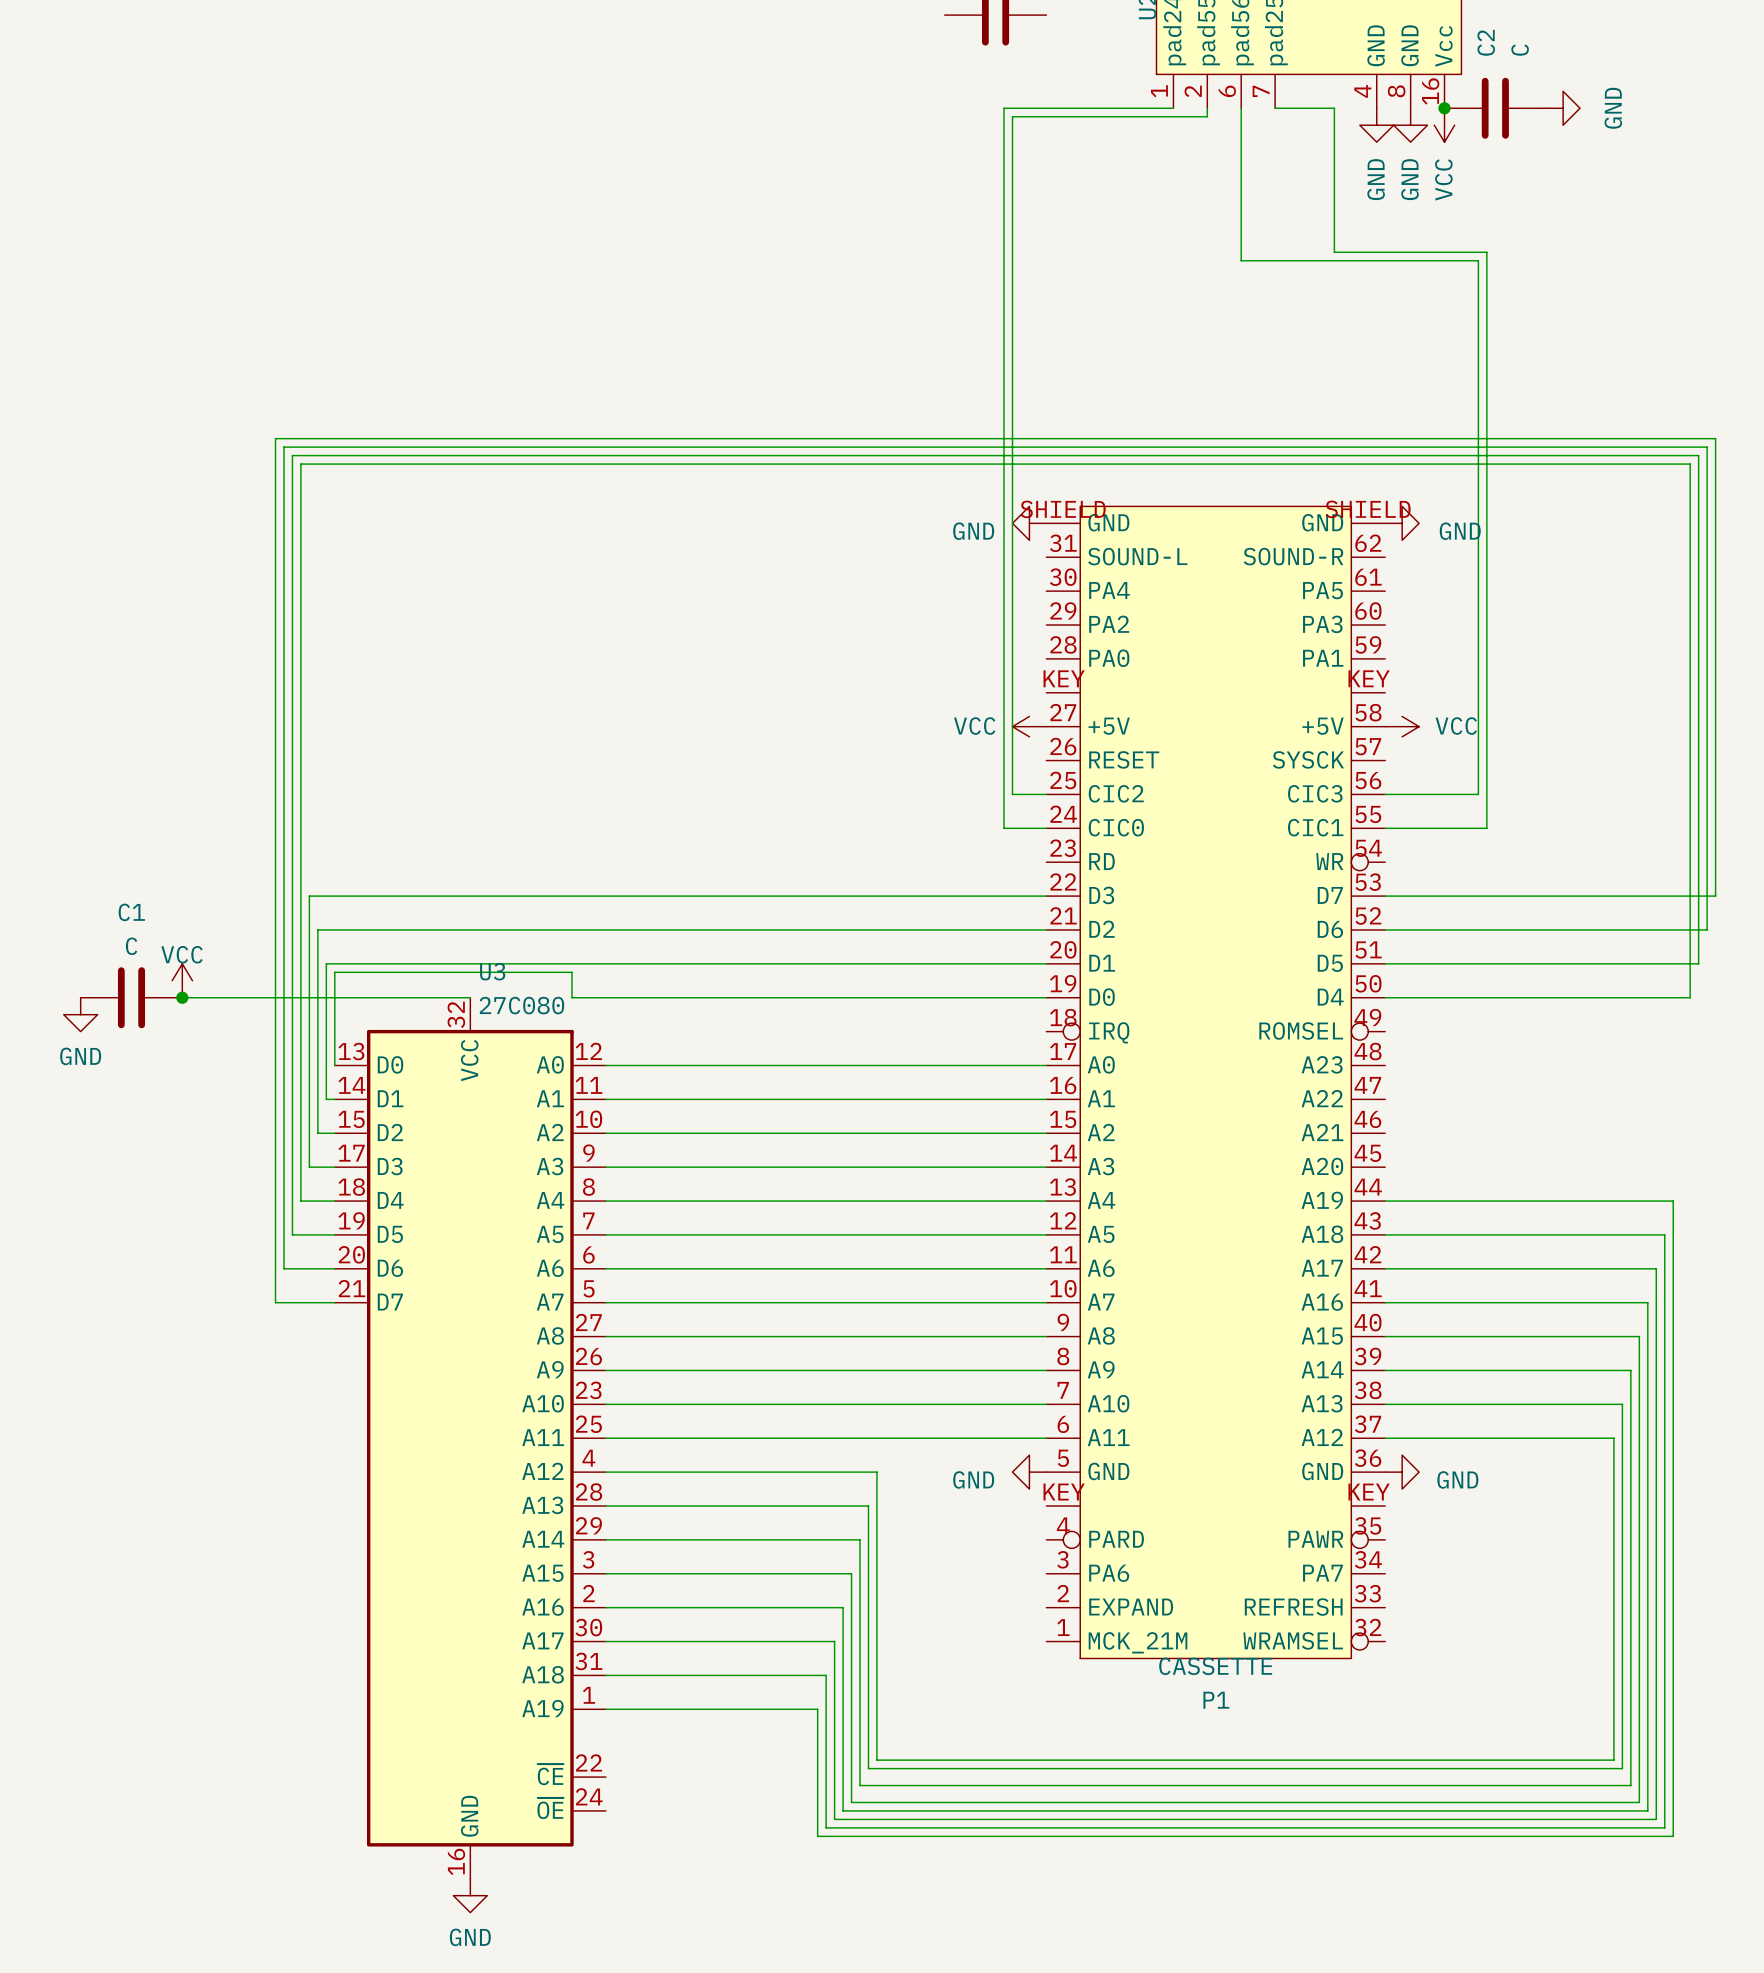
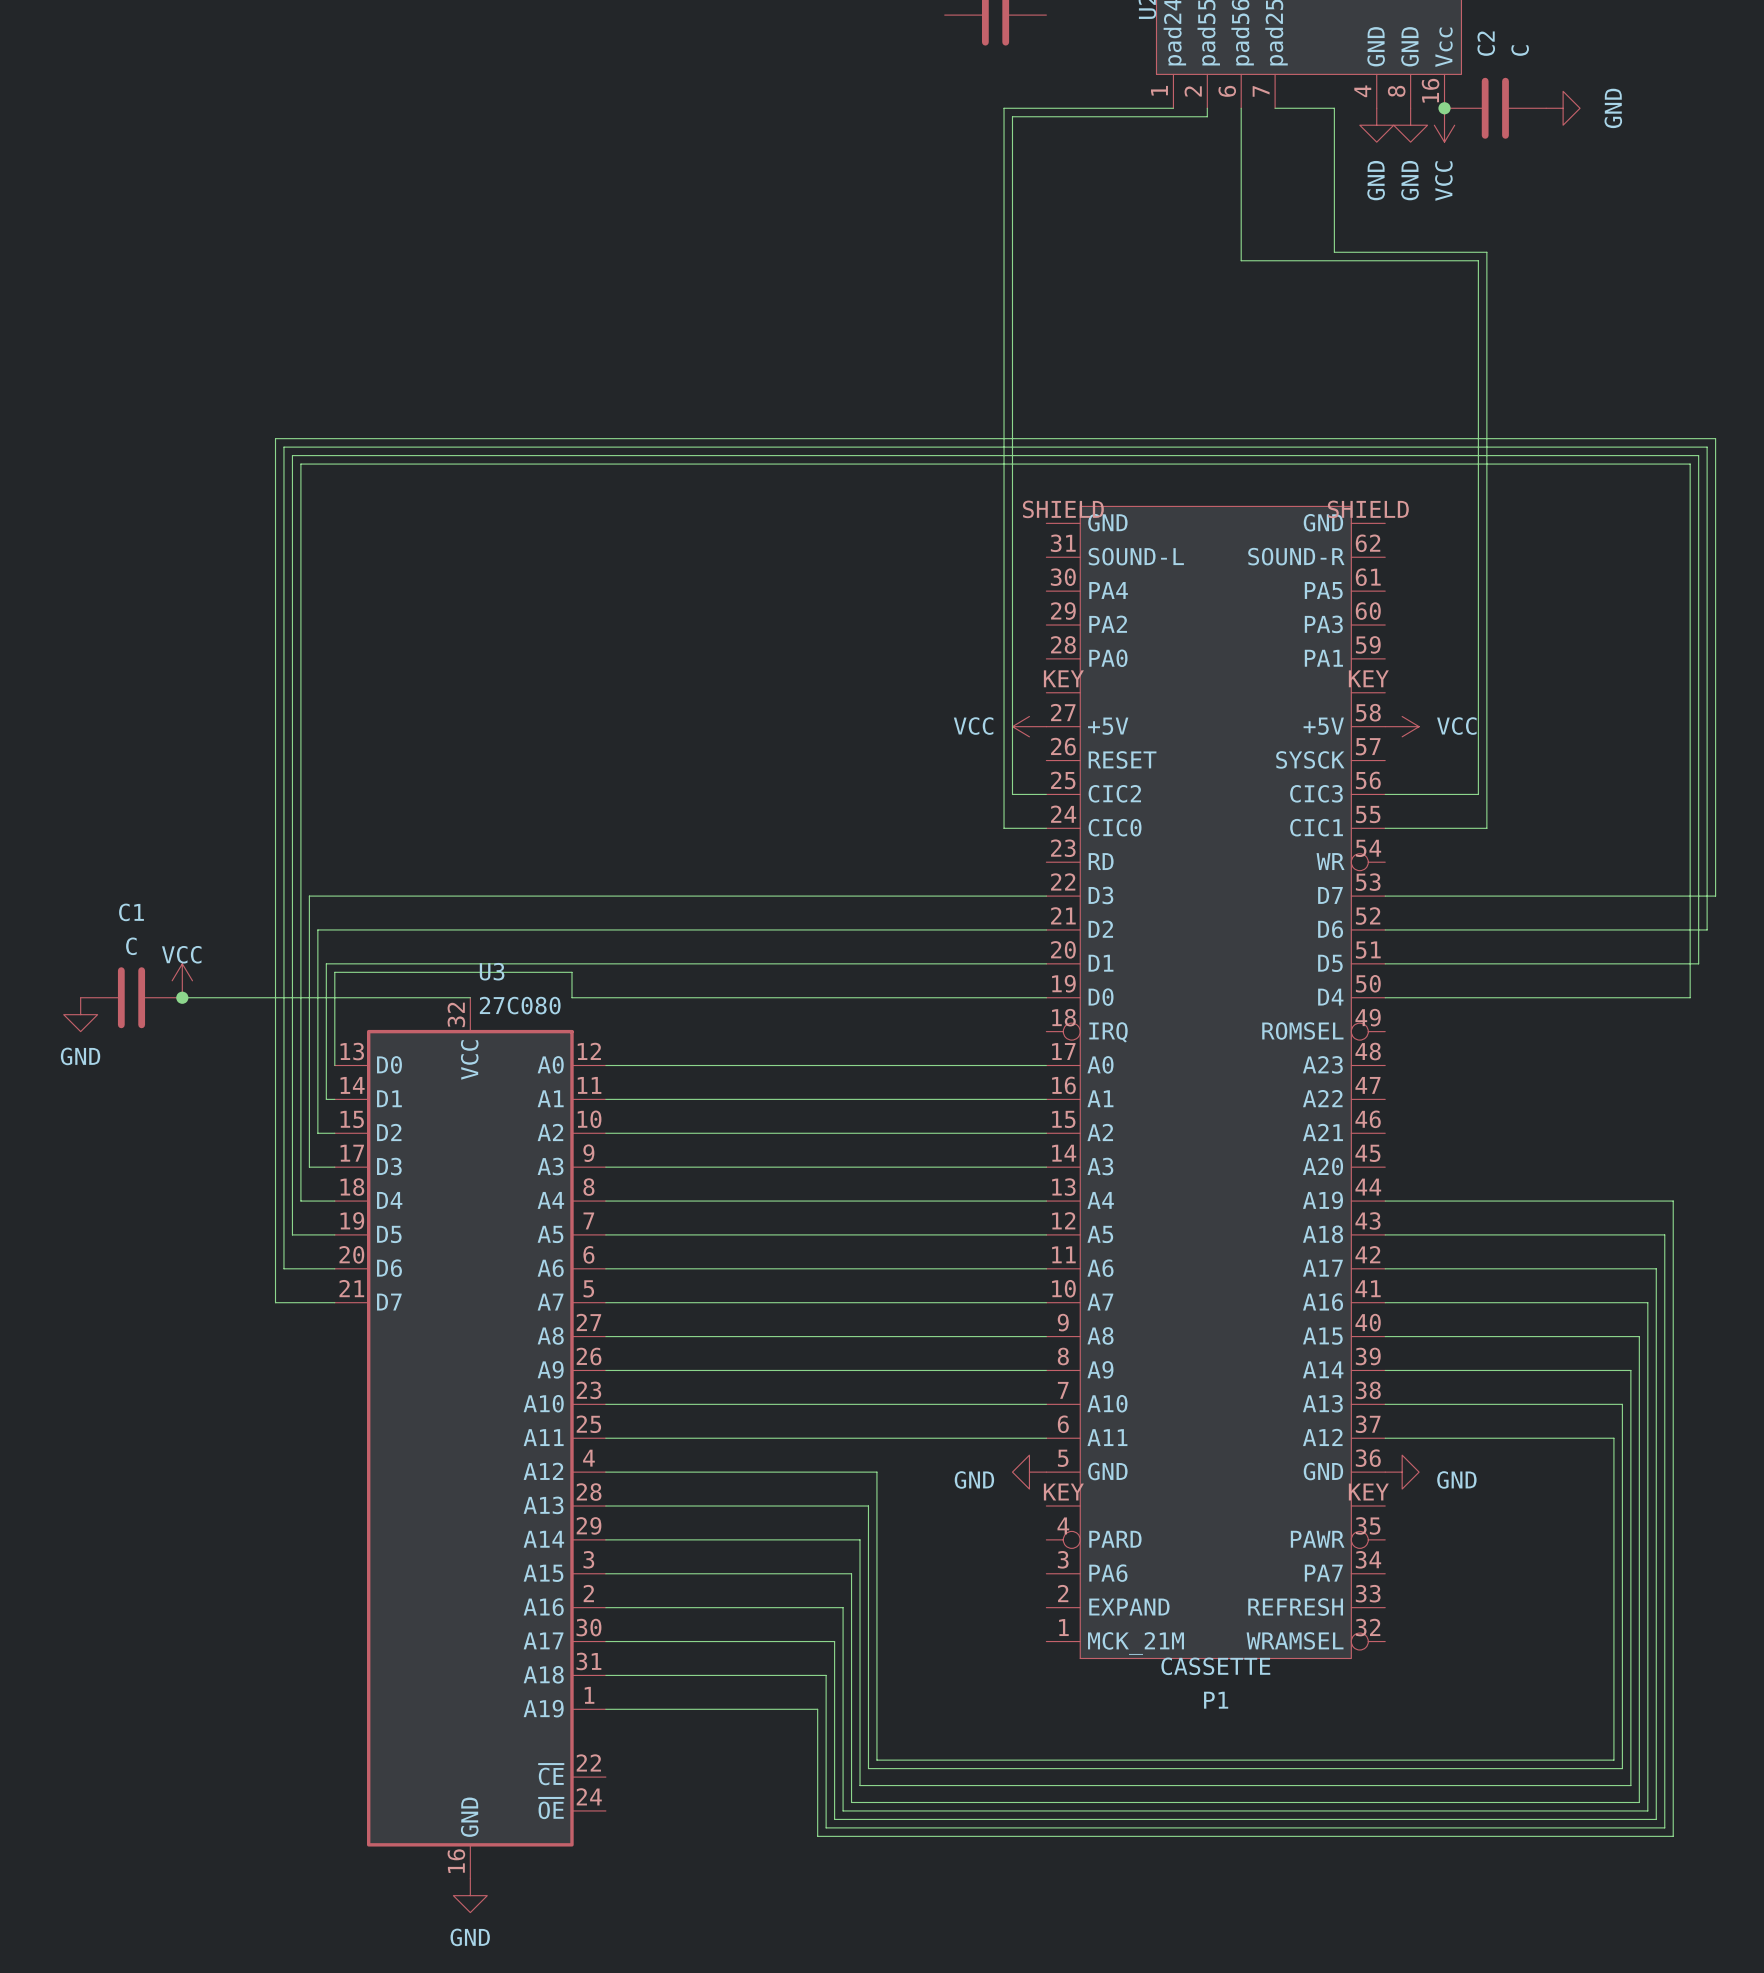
power symbol: GND (1029, 523) -> none
power symbol: GND (1402, 523) -> none

